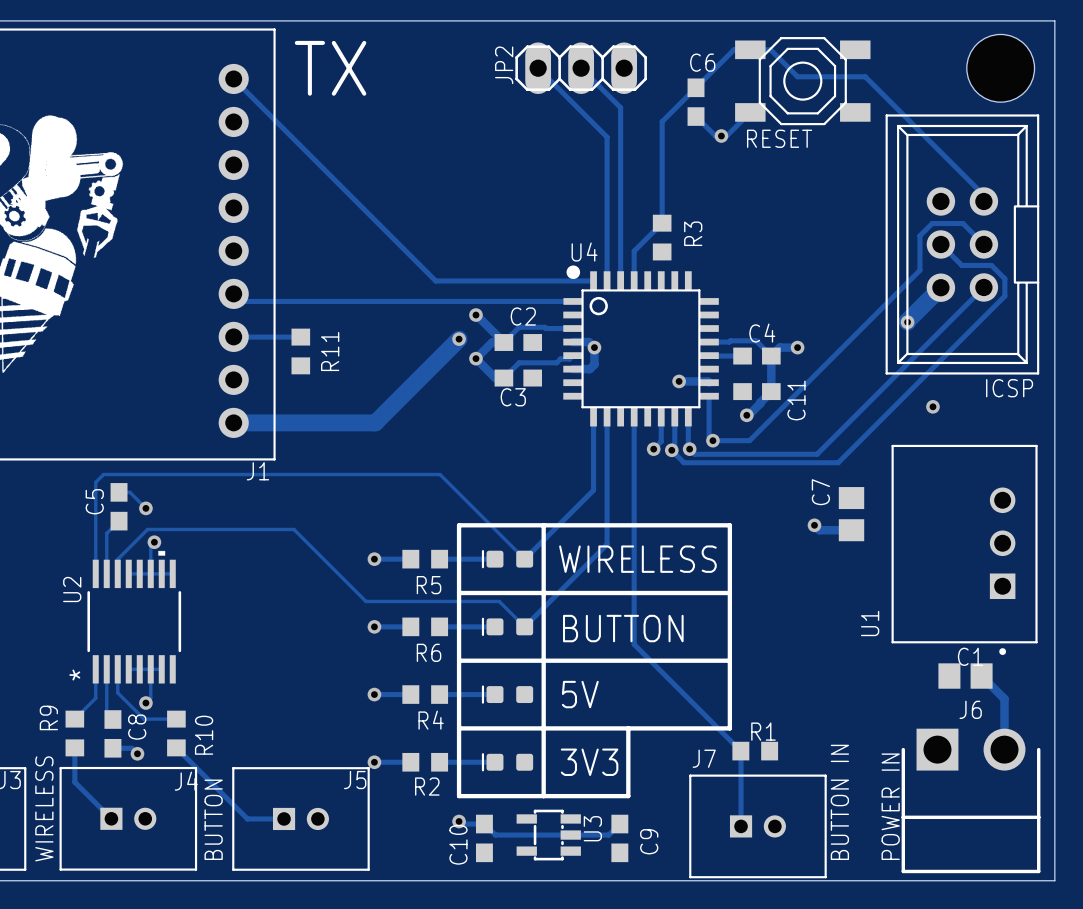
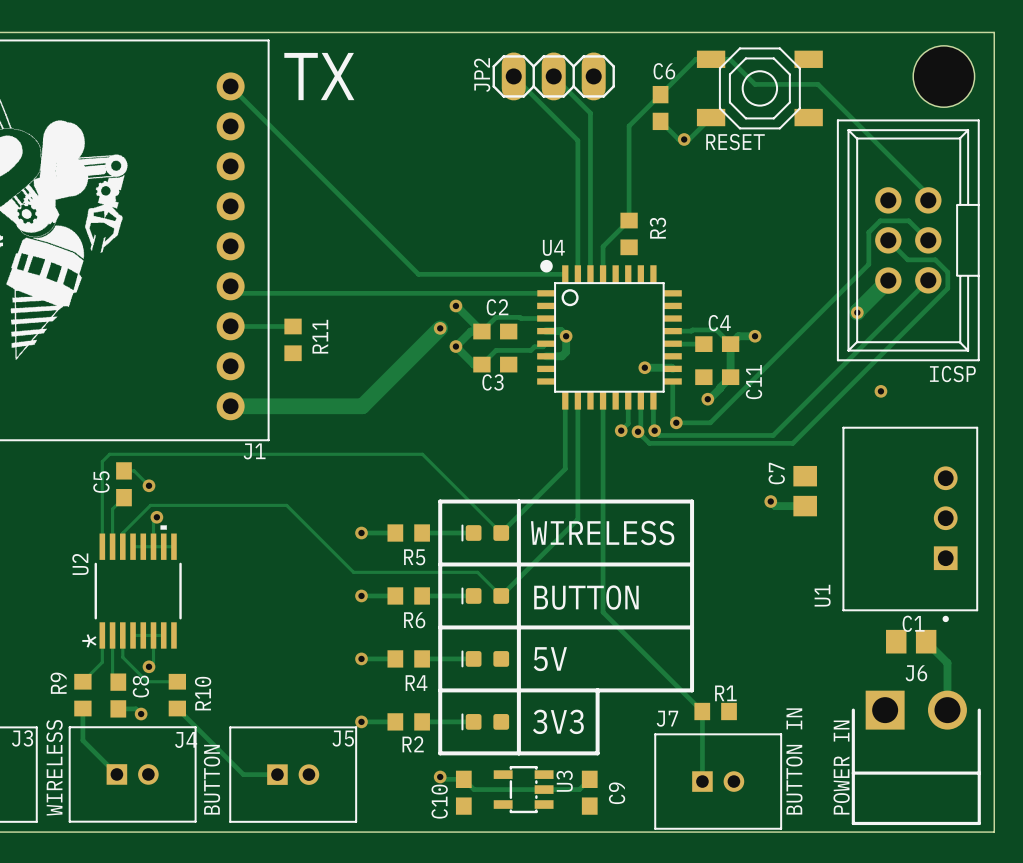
hole: (1000, 68) -> none
part: none -> (943, 76)

